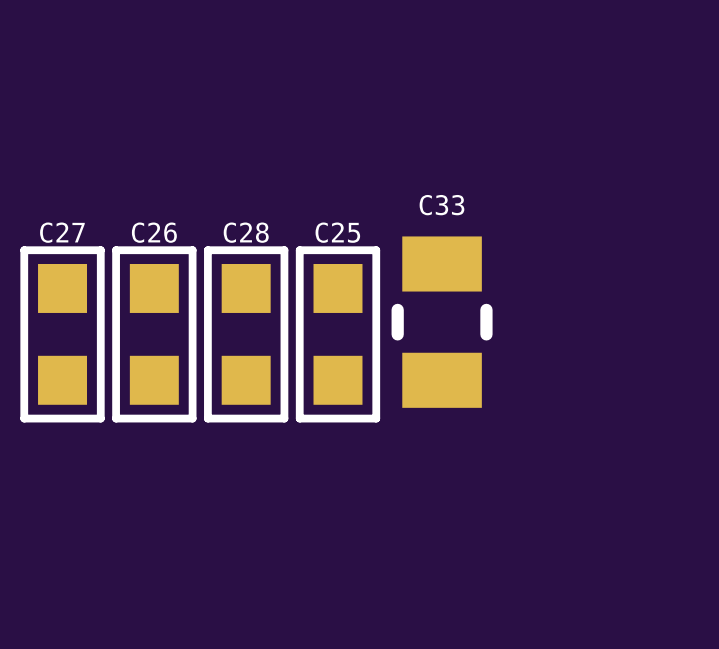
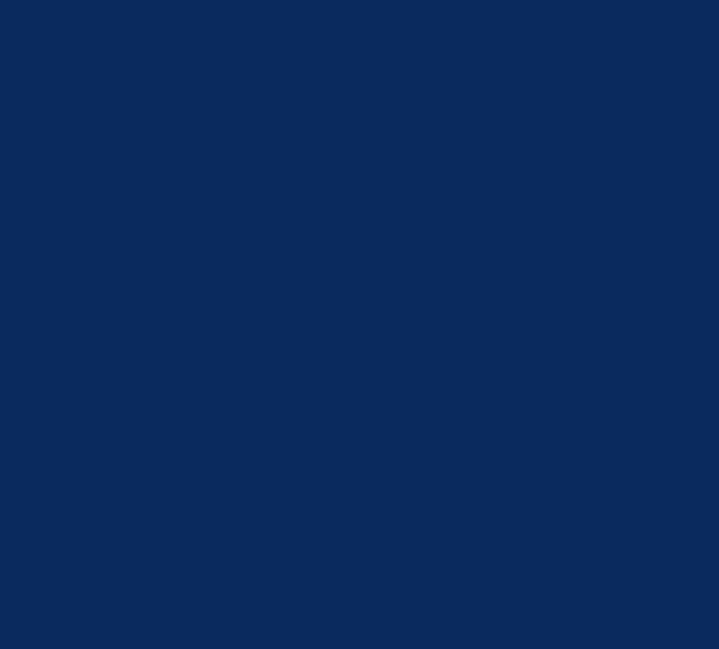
C33: (442, 322) -> none
C27: (62, 334) -> none
C26: (154, 334) -> none
C28: (246, 334) -> none
C25: (337, 334) -> none

